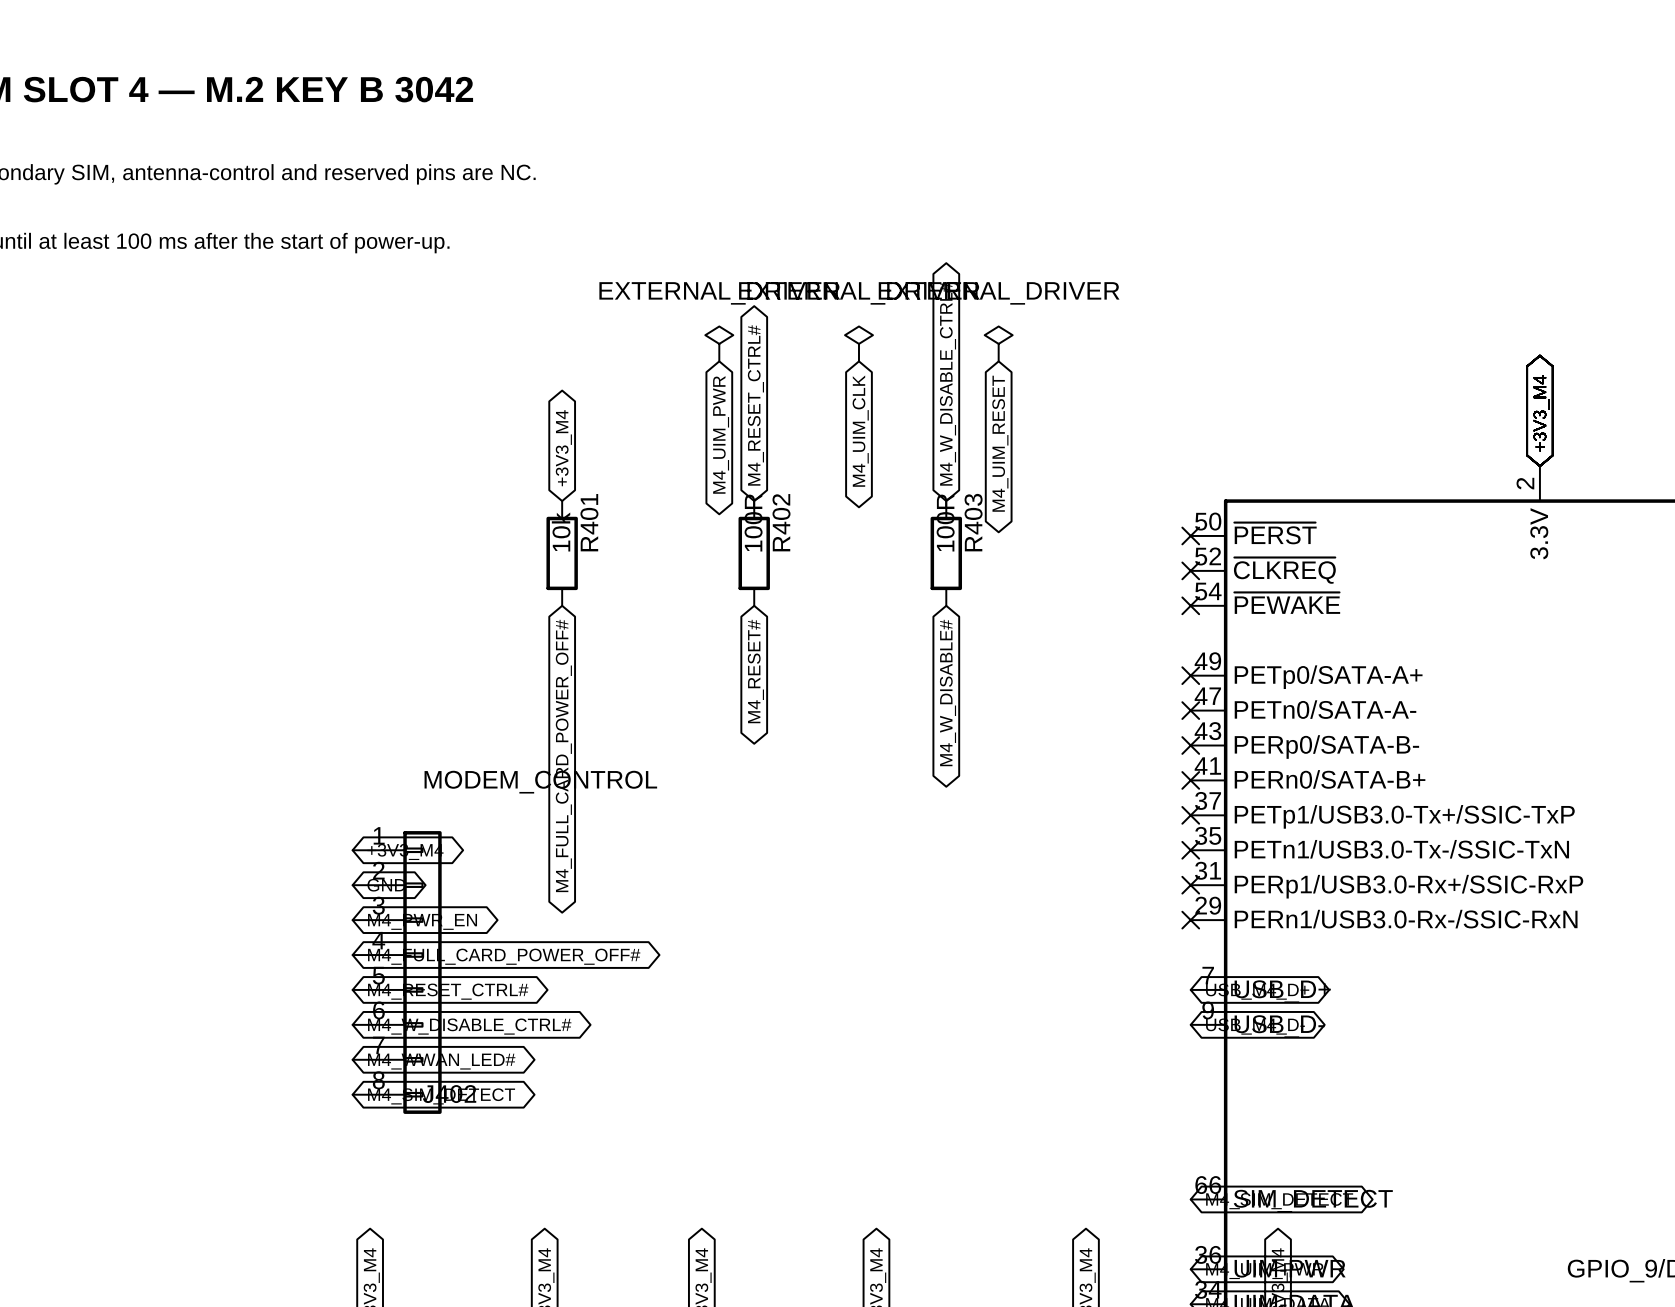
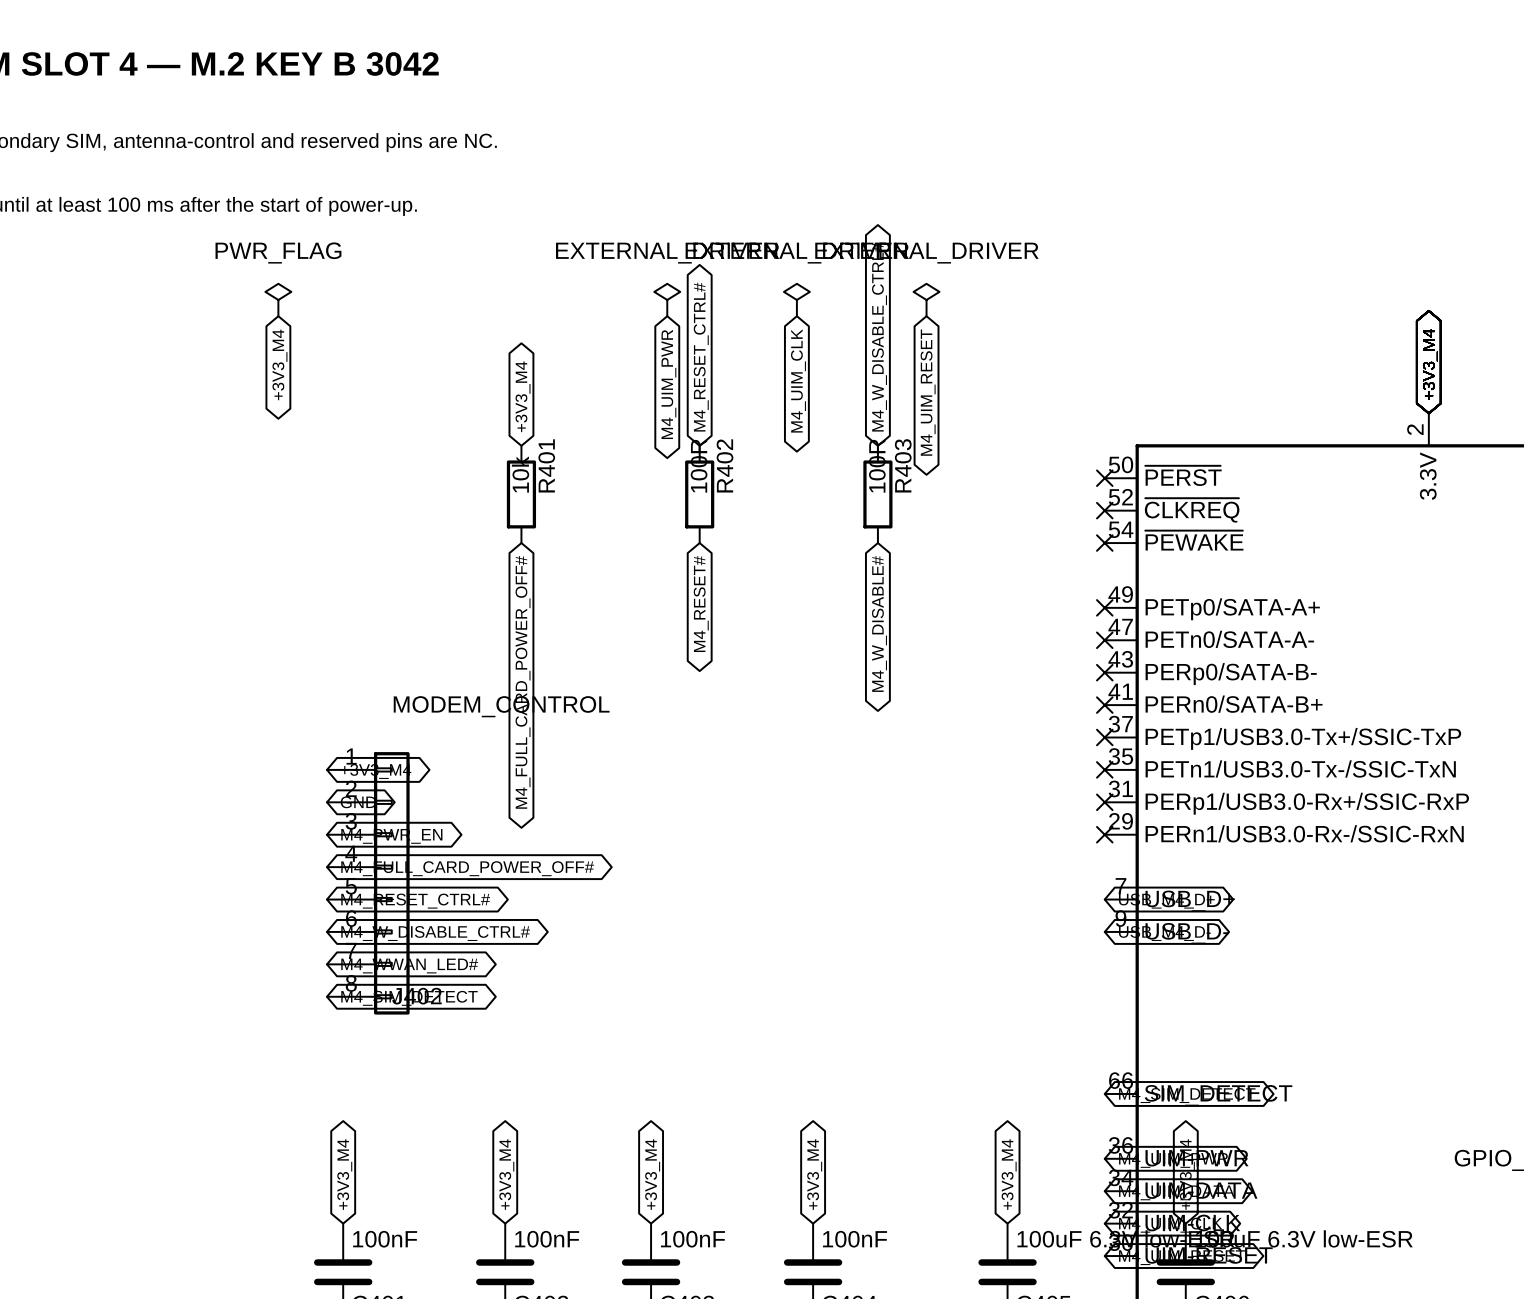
power symbol: none -> PWR_FLAG (278, 300)
global label: none -> +3V3_M4 (279, 364)

